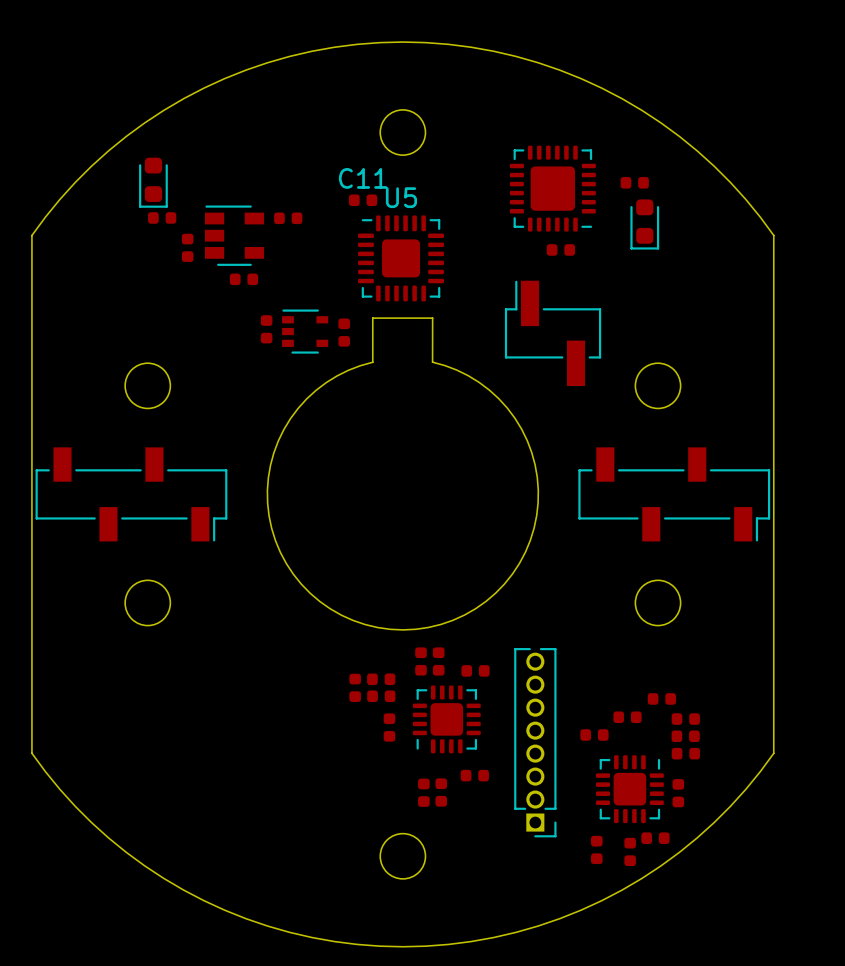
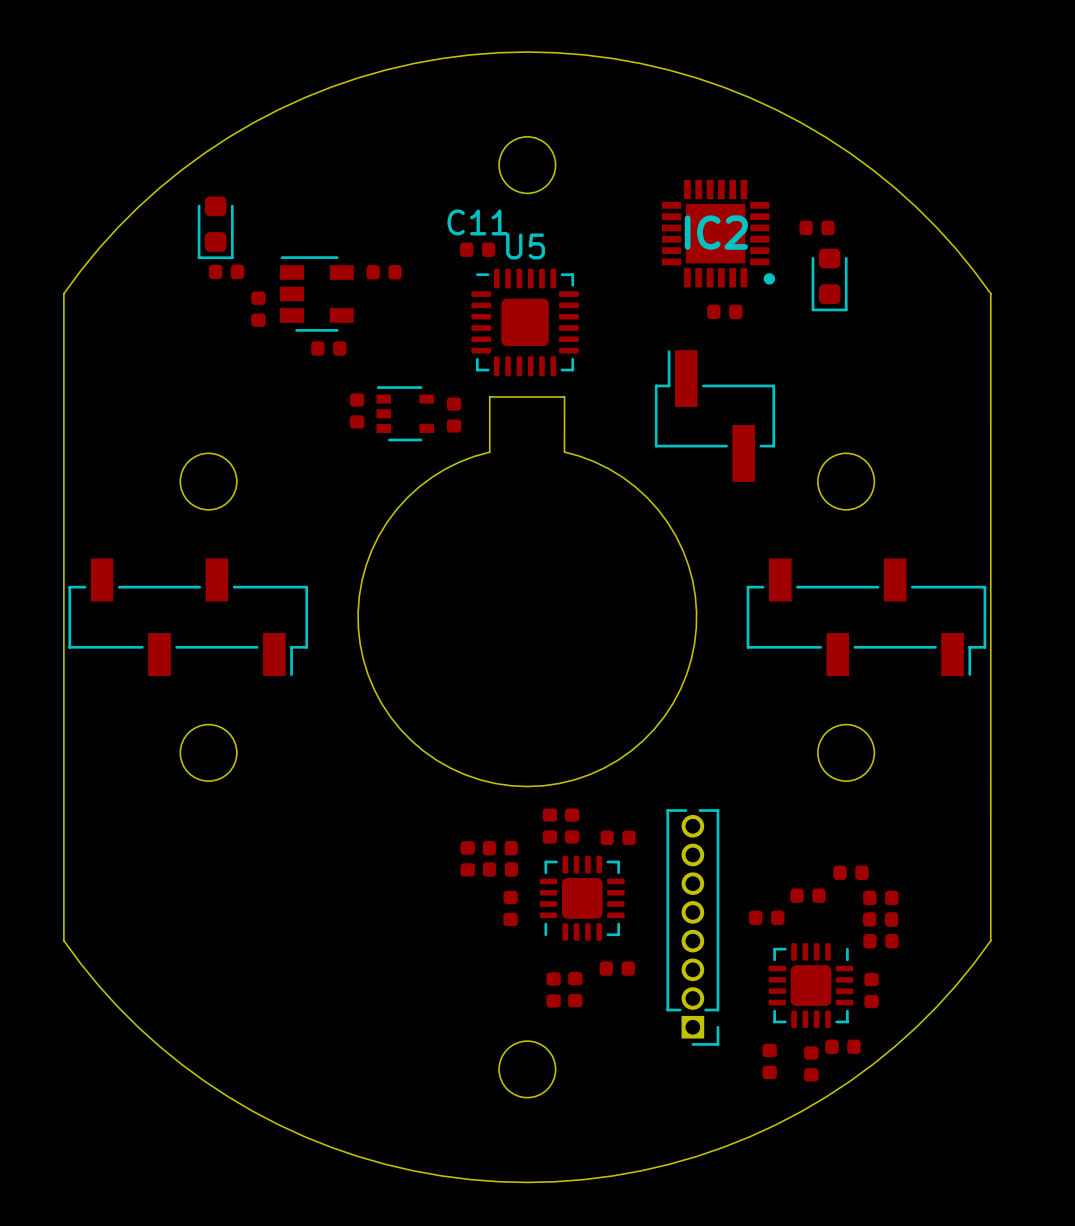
IC2: none -> (718, 233)
part: (552, 188) -> none

